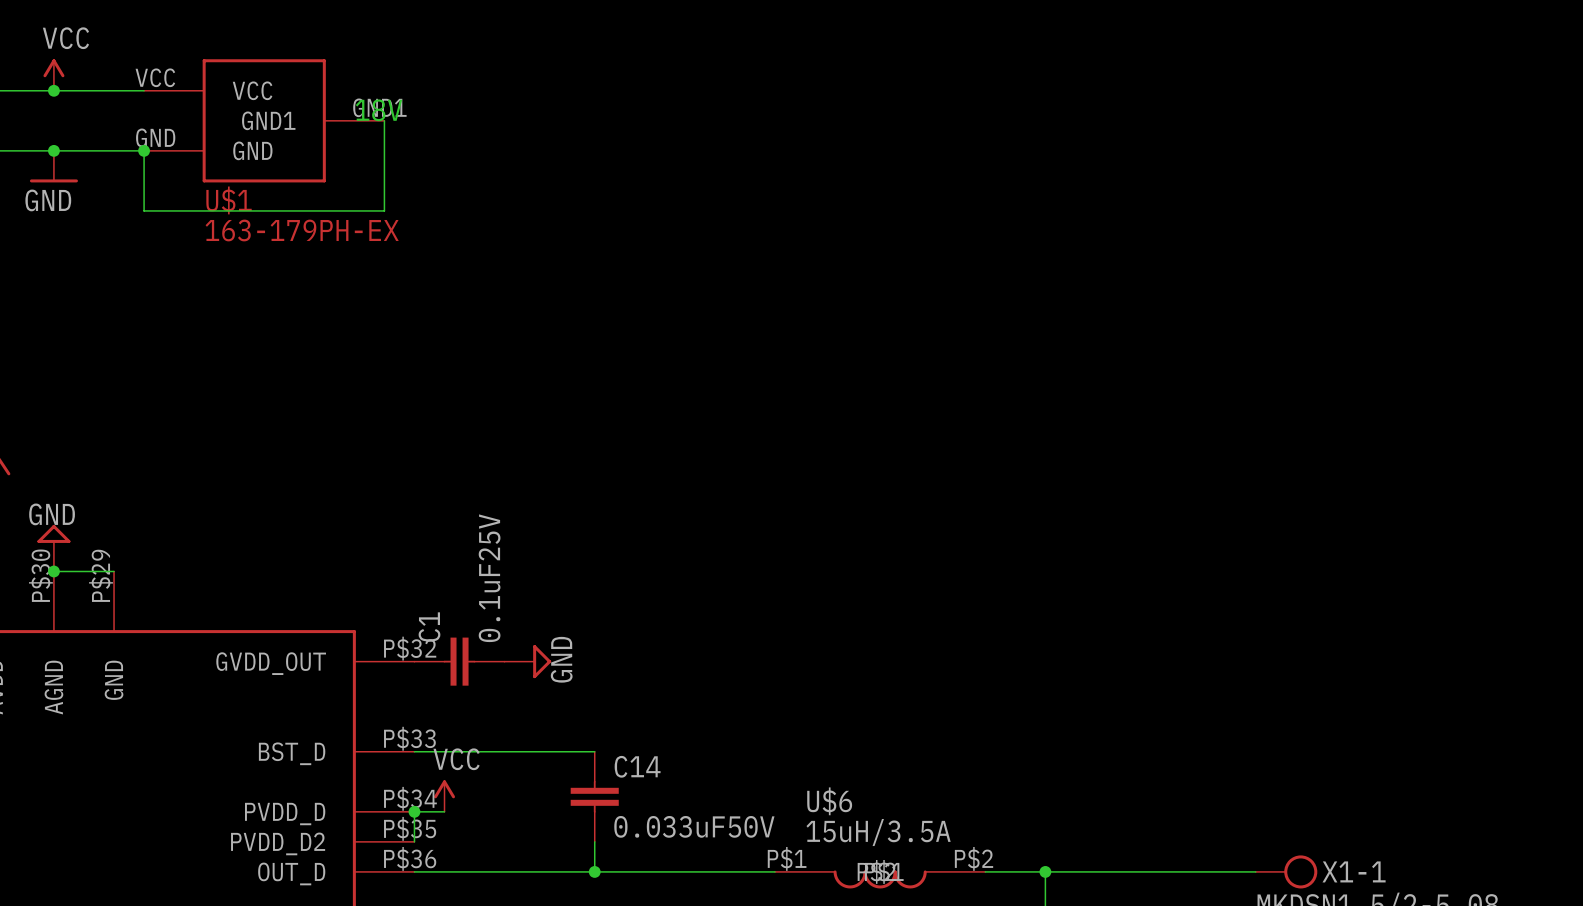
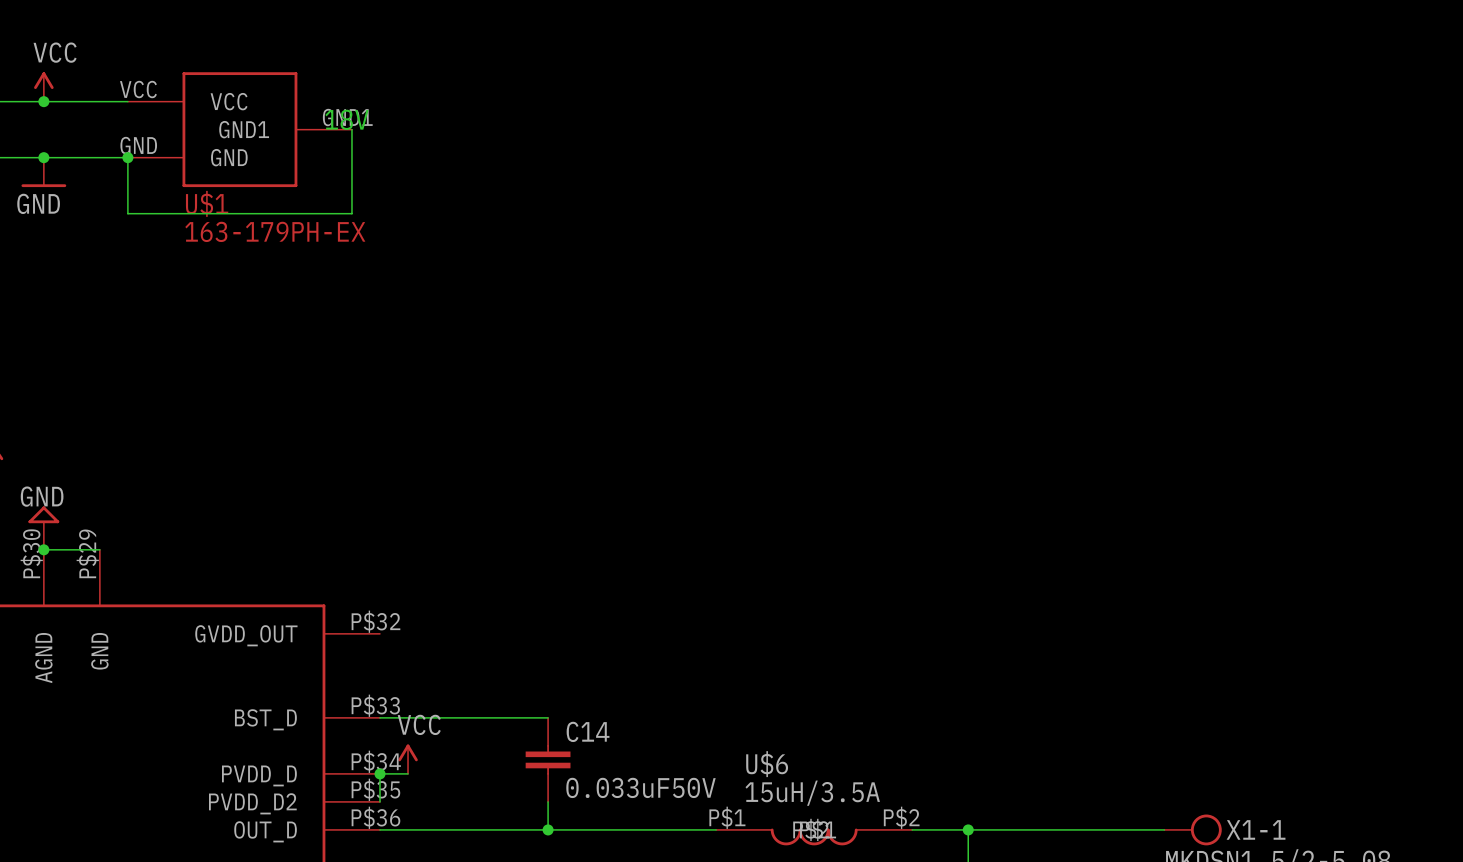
C1: 0.1uF25V (459, 661) -> none
power symbol: GND (527, 661) -> none

